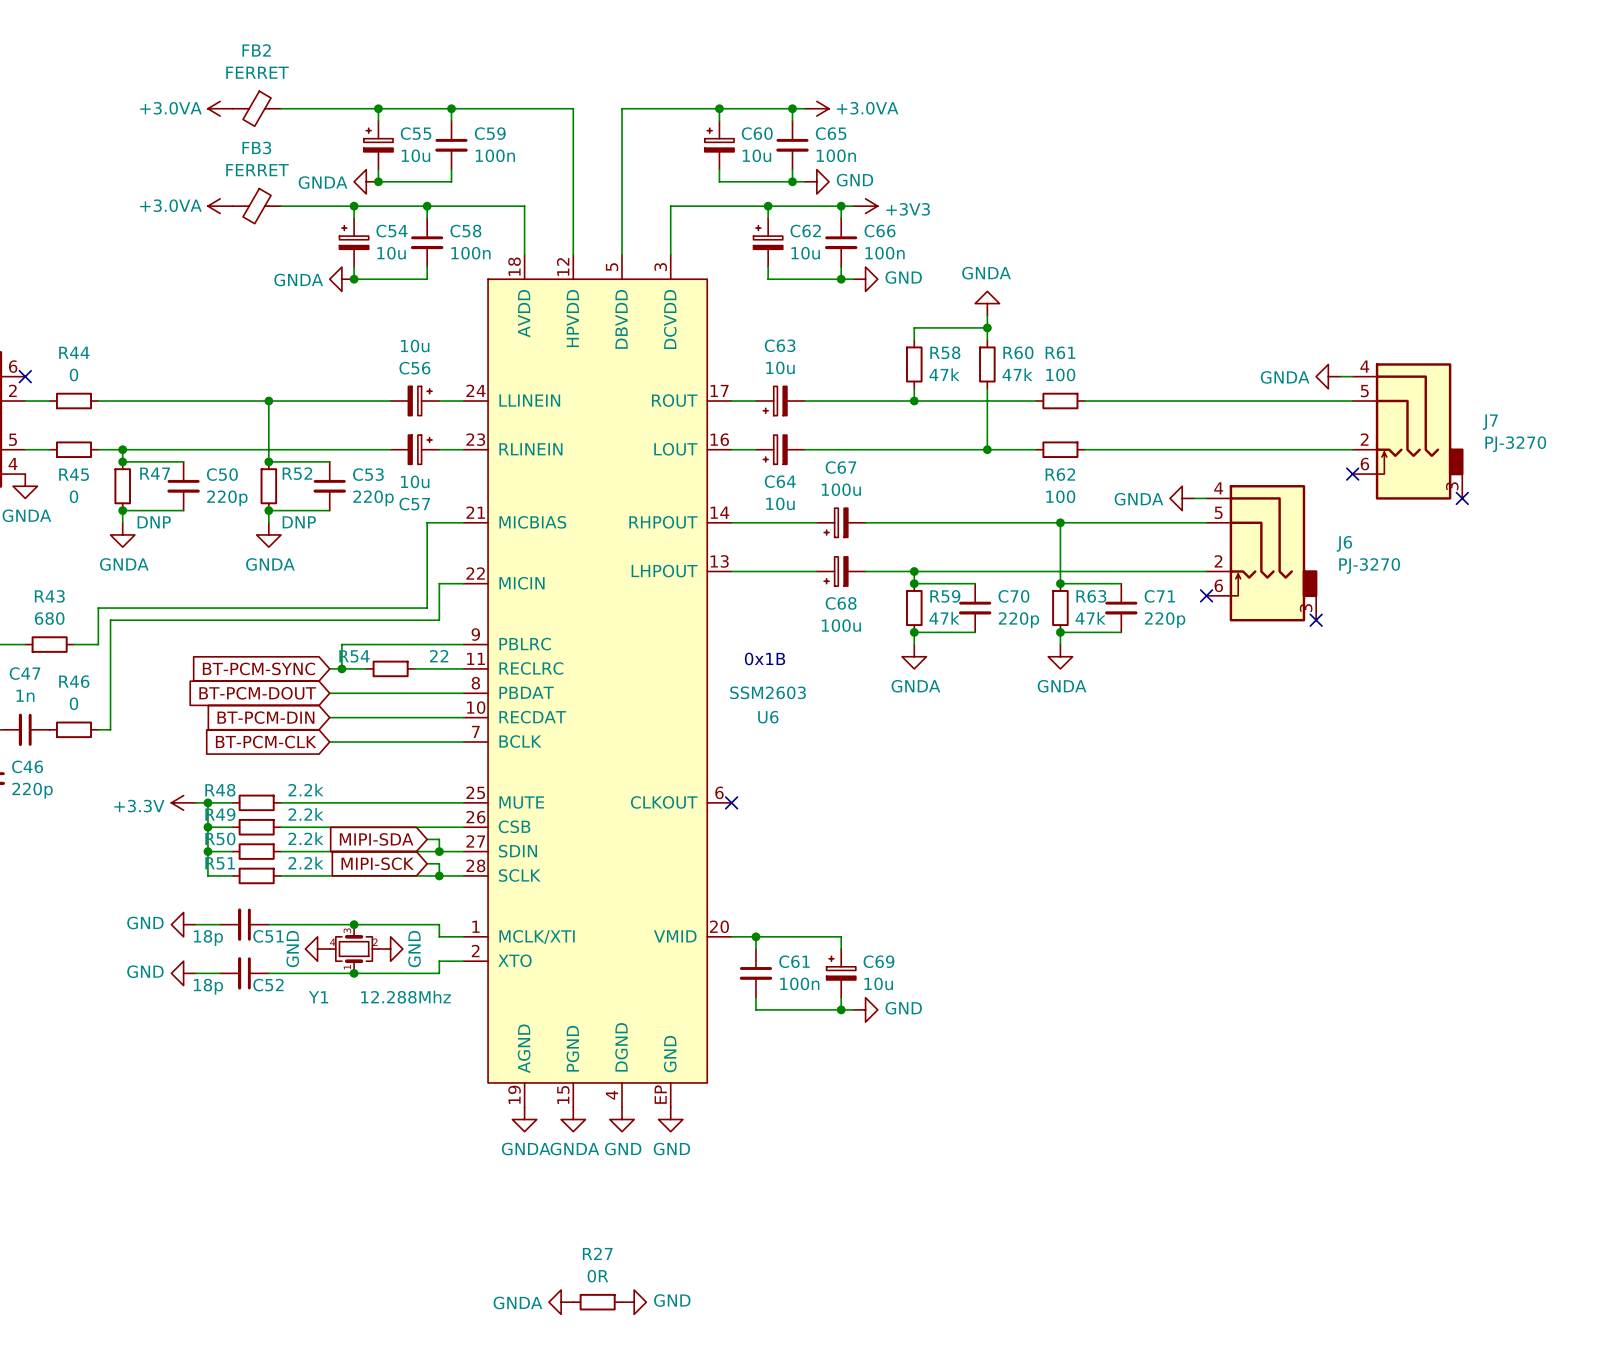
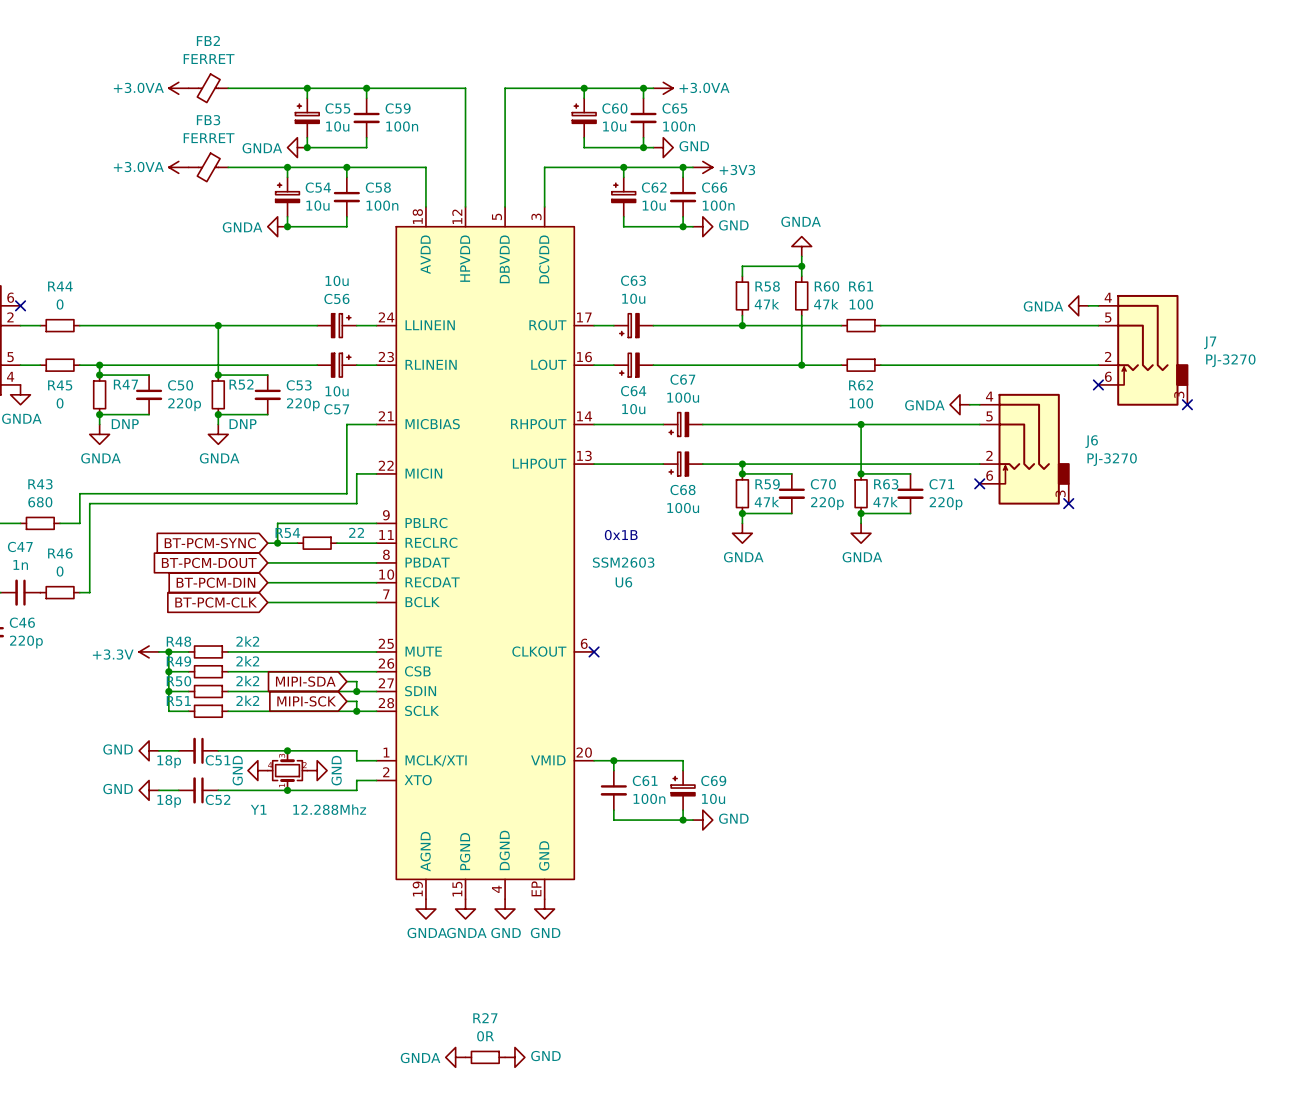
R48 value: 2.2k (305, 789) -> 2k2 (247, 641)
R49 value: 2.2k (305, 814) -> 2k2 (247, 661)
R50 value: 2.2k (305, 838) -> 2k2 (247, 681)
R51 value: 2.2k (305, 863) -> 2k2 (247, 700)

